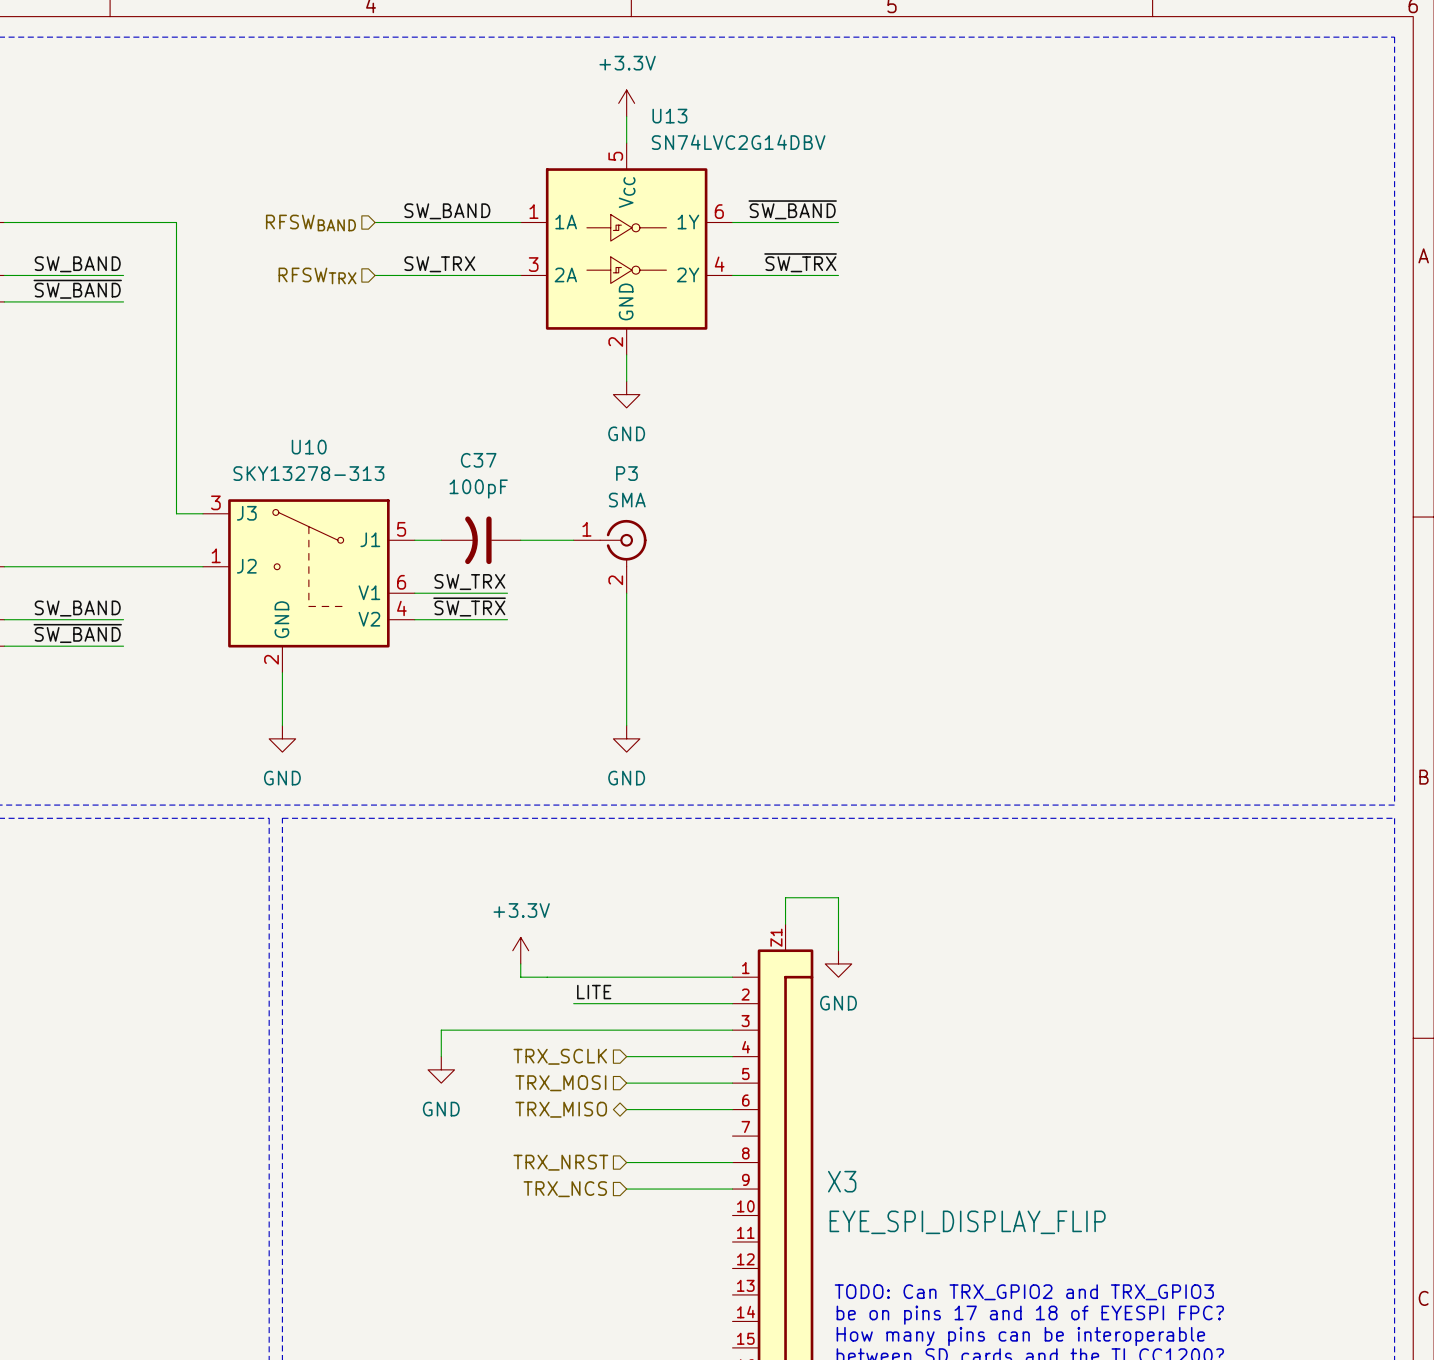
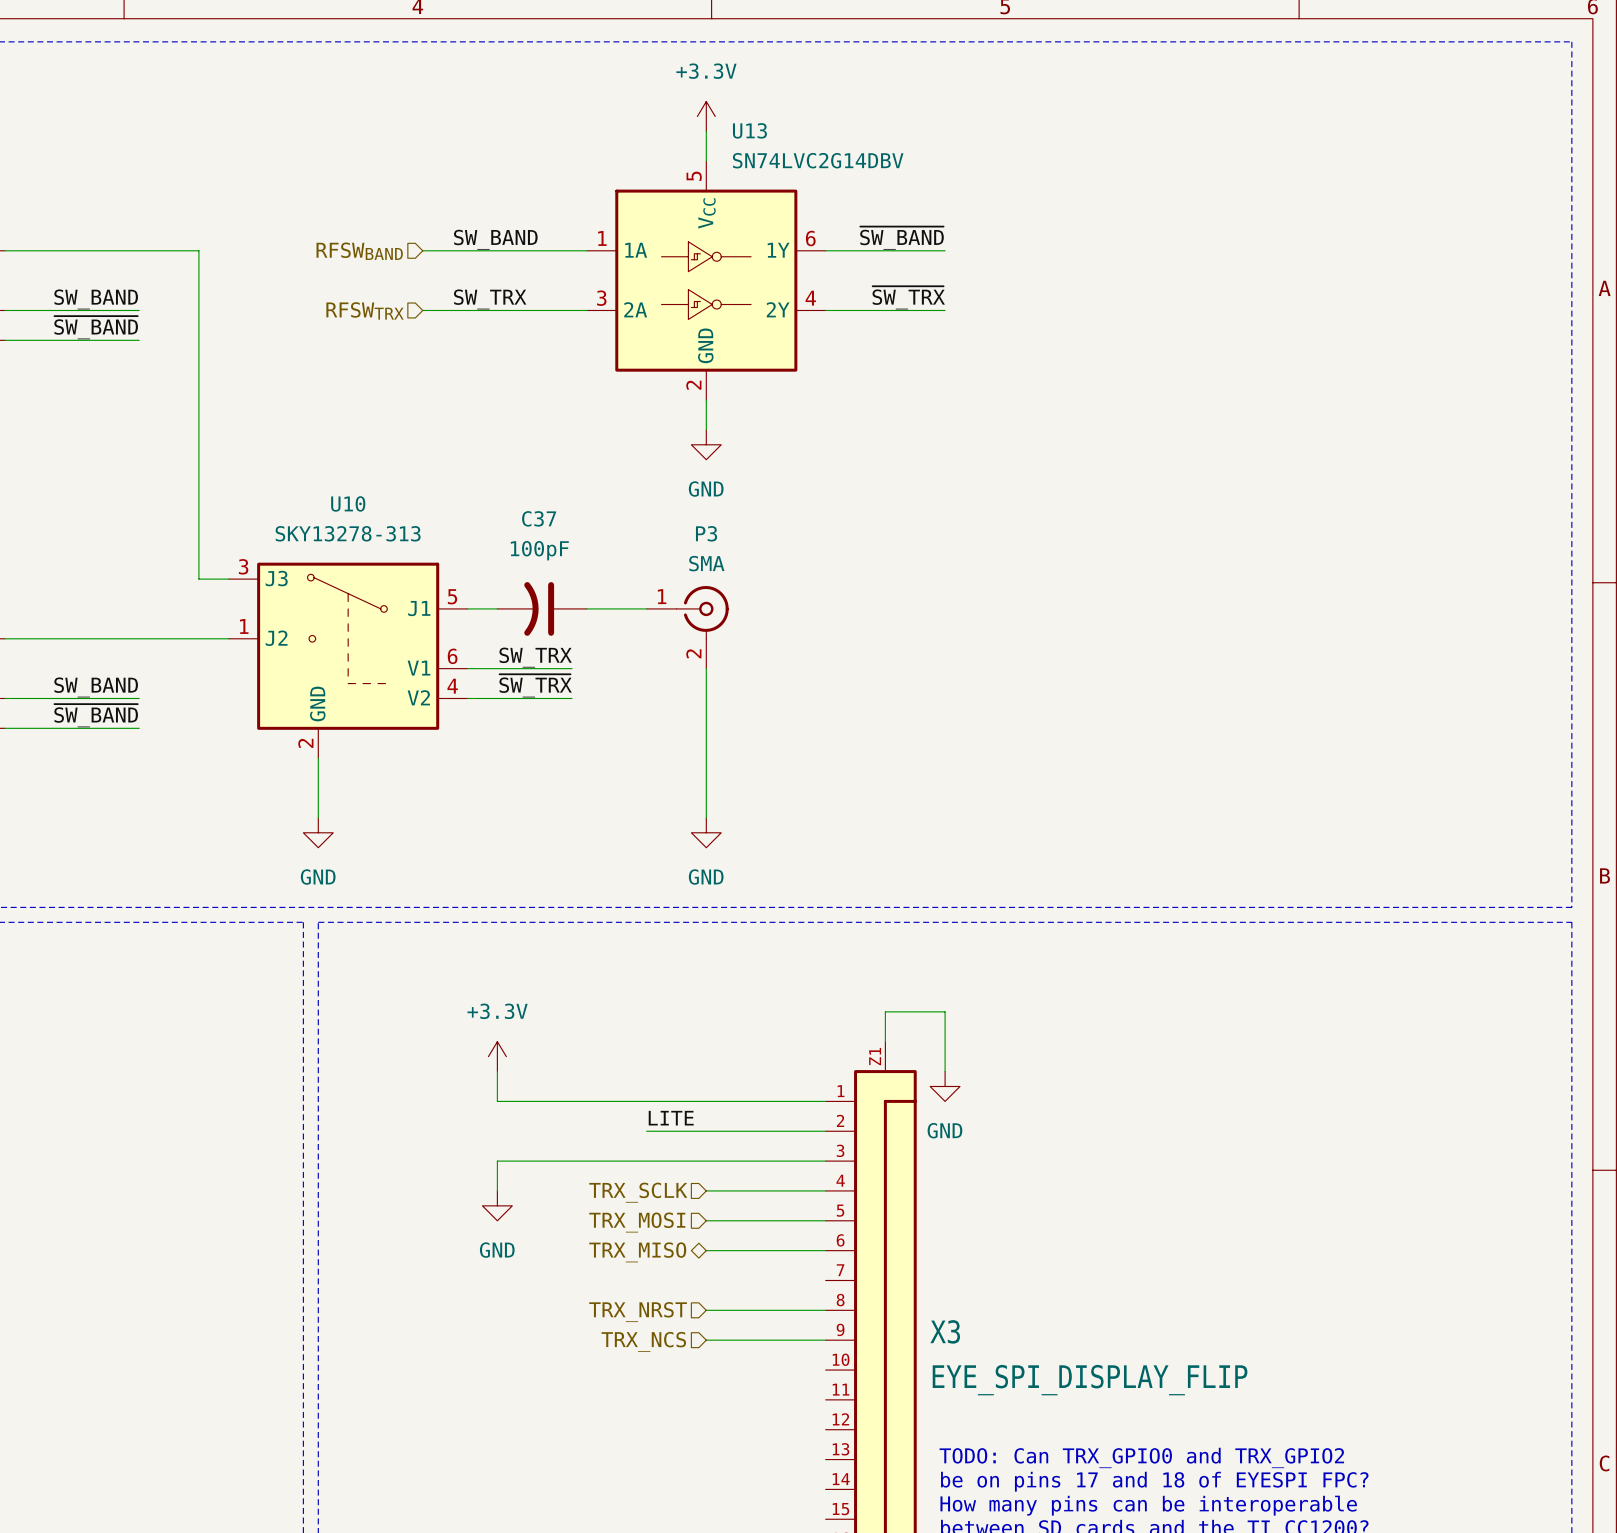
power symbol position: +3.3V (520, 950) -> +3.3V (497, 1056)
wire: (520, 963) (520, 977) -> (497, 1071) (497, 1101) (586, 1101)
text: TODO: Can TRX_GPIO2 and TRX_GPIO3 (1024, 1292) -> TODO: Can TRX_GPIO0 and TRX_GPIO2 (1141, 1457)

